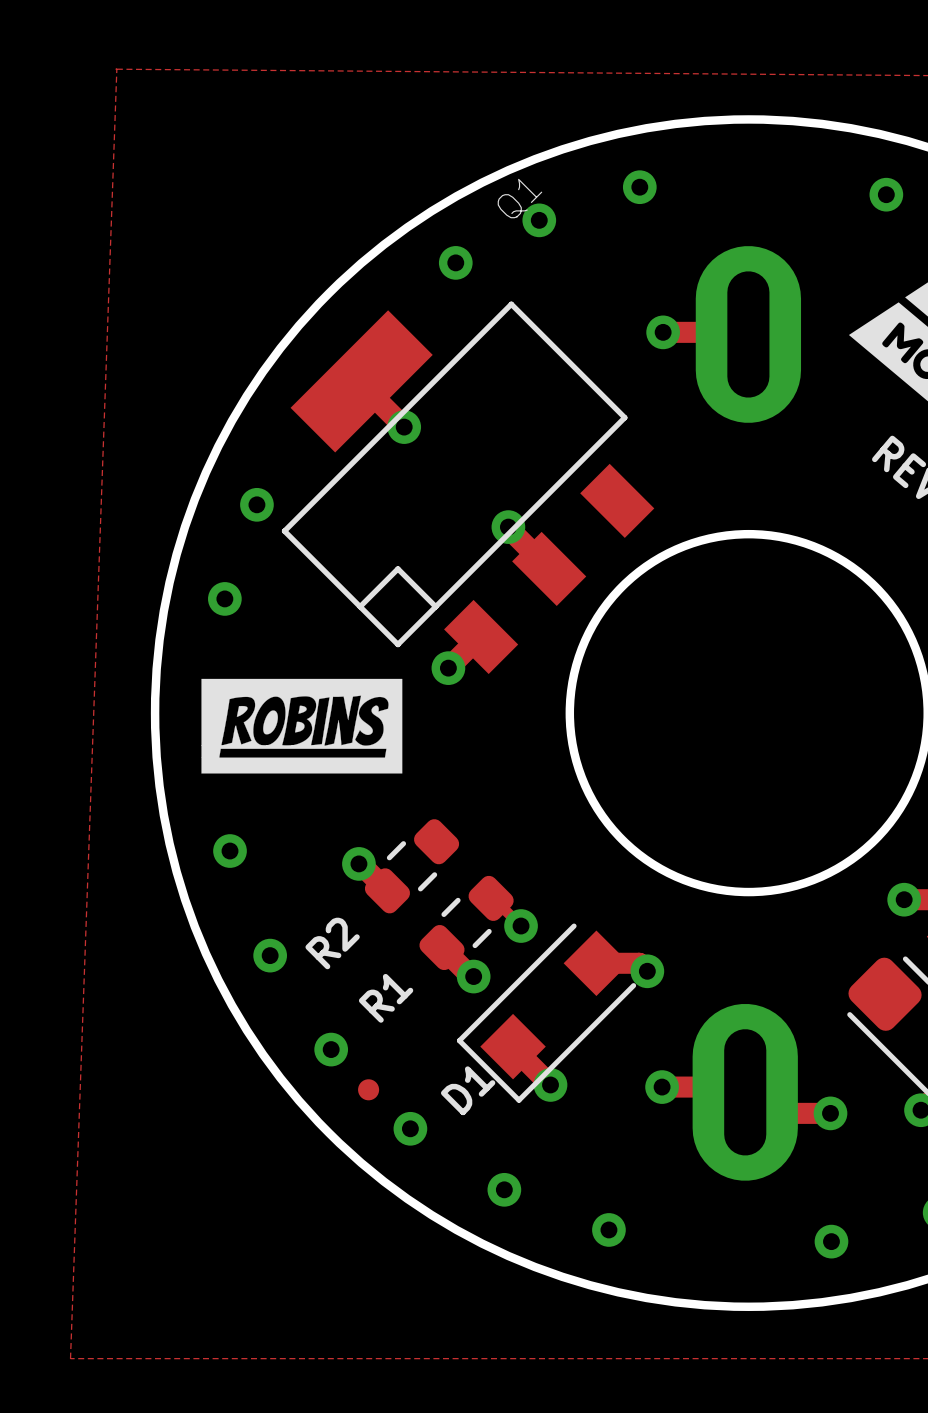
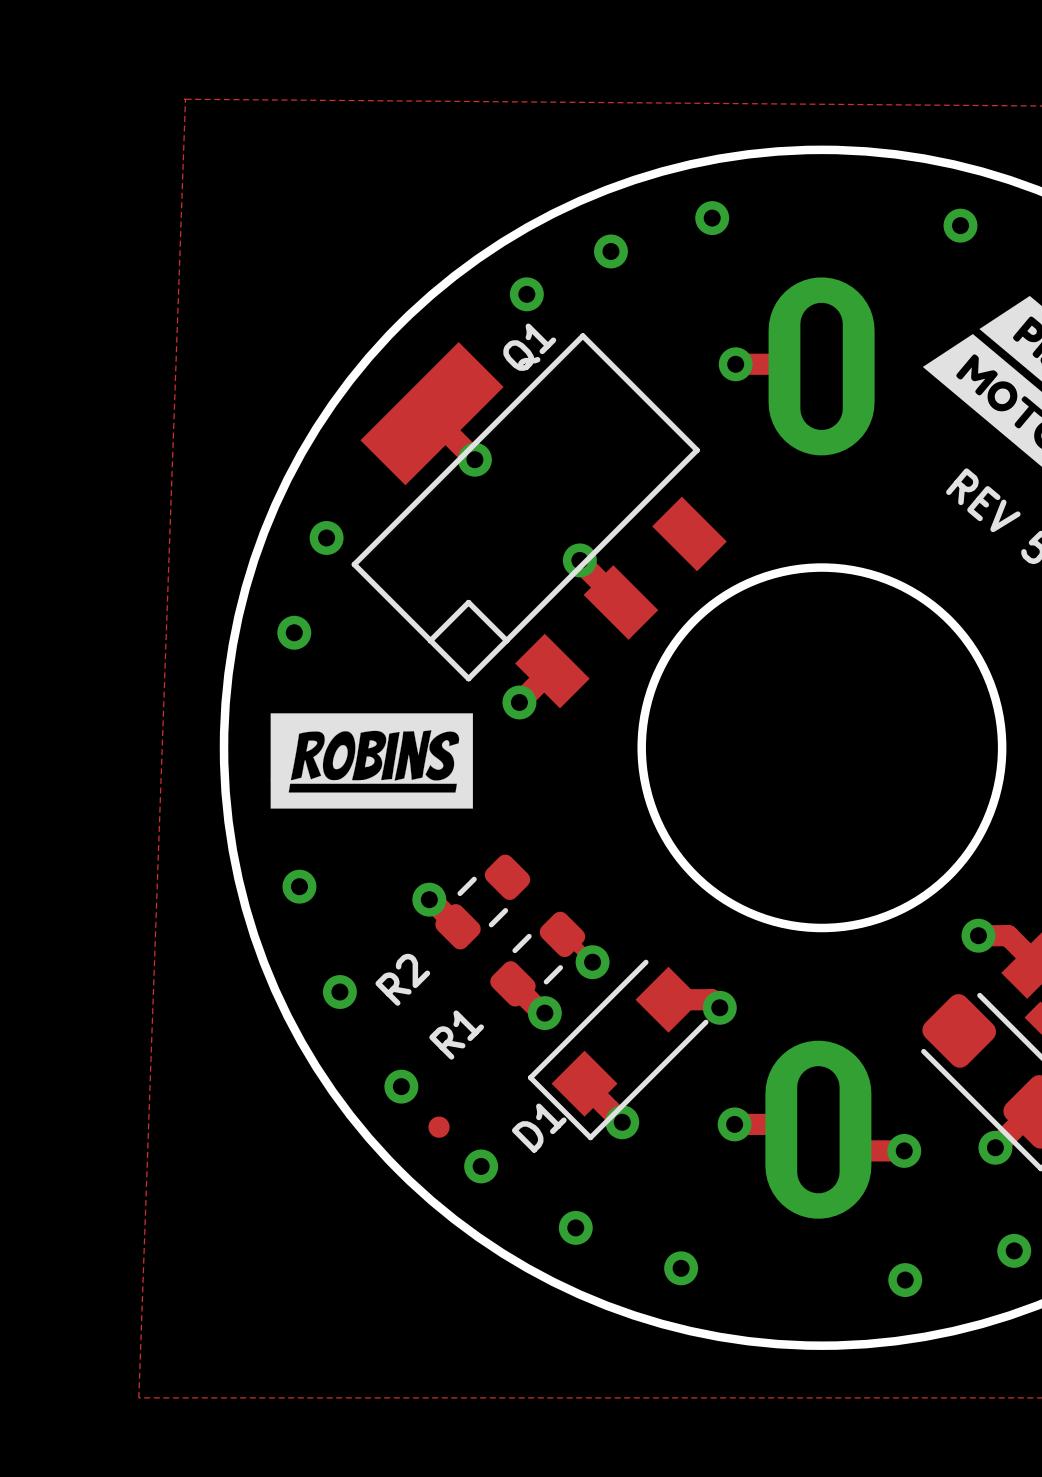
Q1 name position: Q1 (519, 198) -> Q1 (529, 347)

